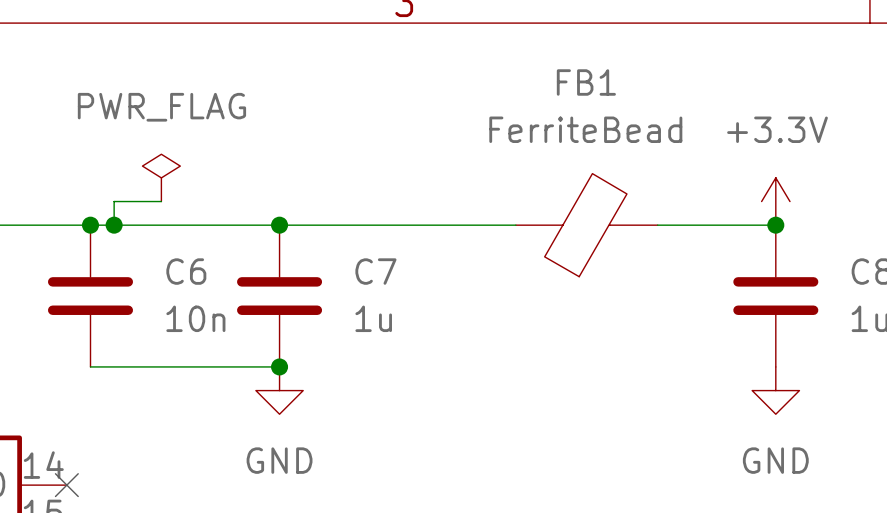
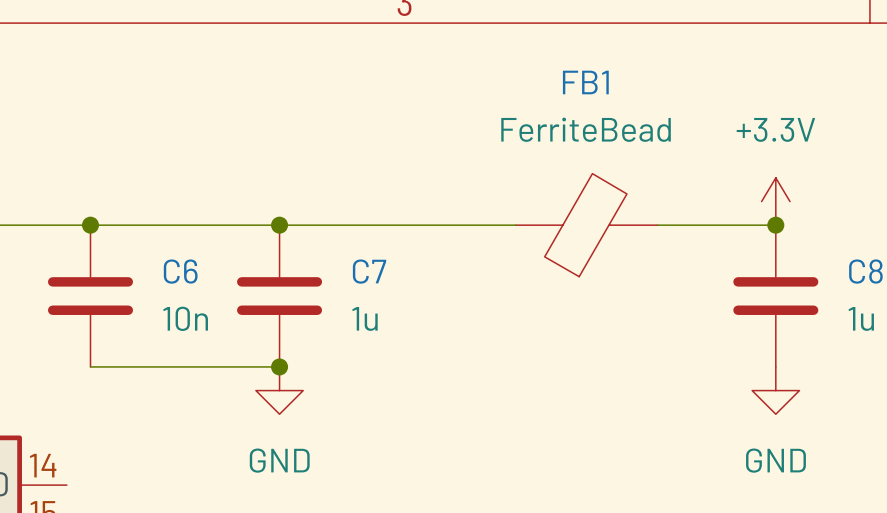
power symbol: PWR_FLAG (161, 177) -> none
wire: (161, 201) (114, 201) (114, 225) -> none
junction: (114, 225) -> none
no-connect mark: (66, 485) -> none

